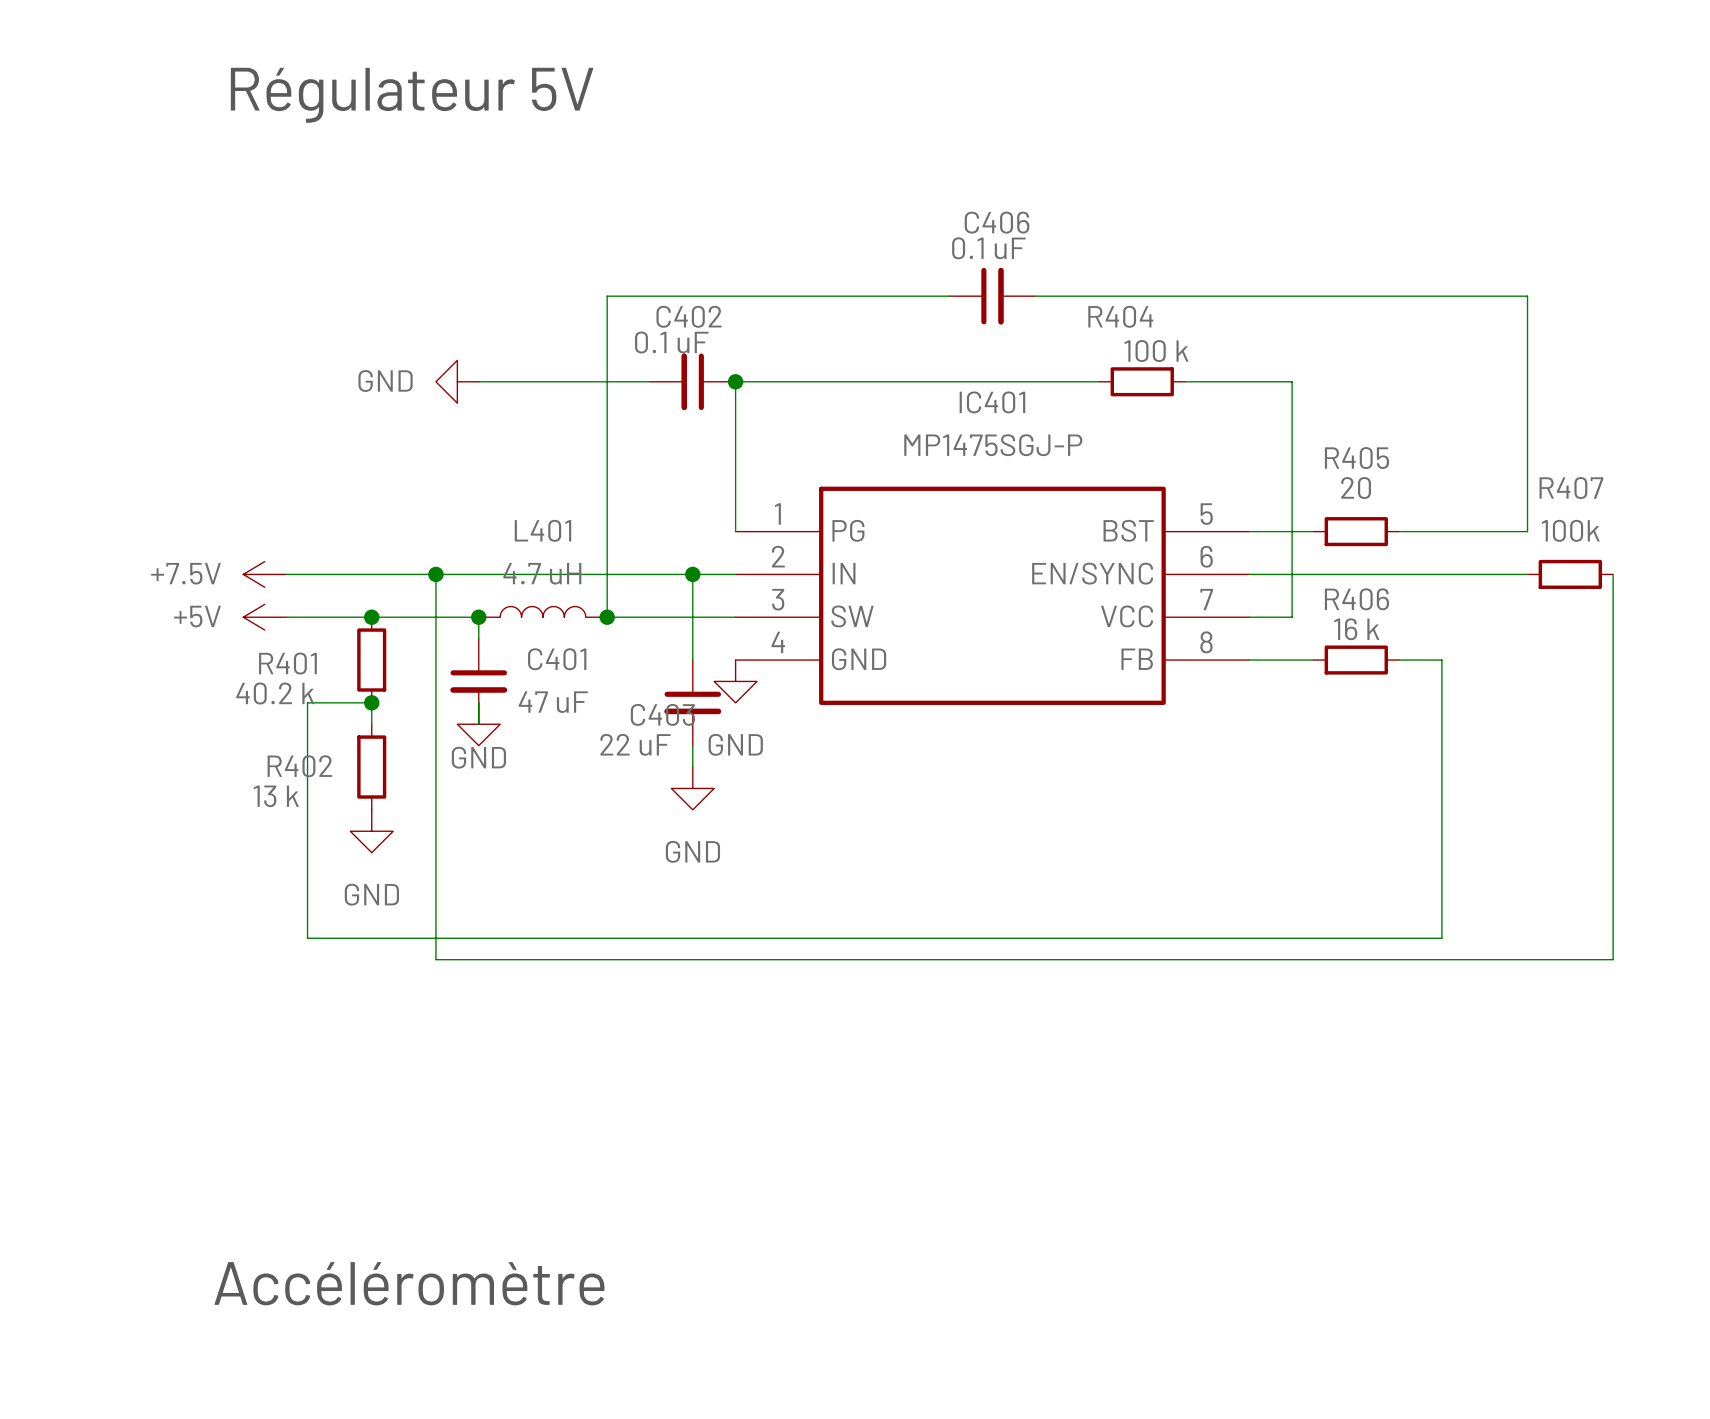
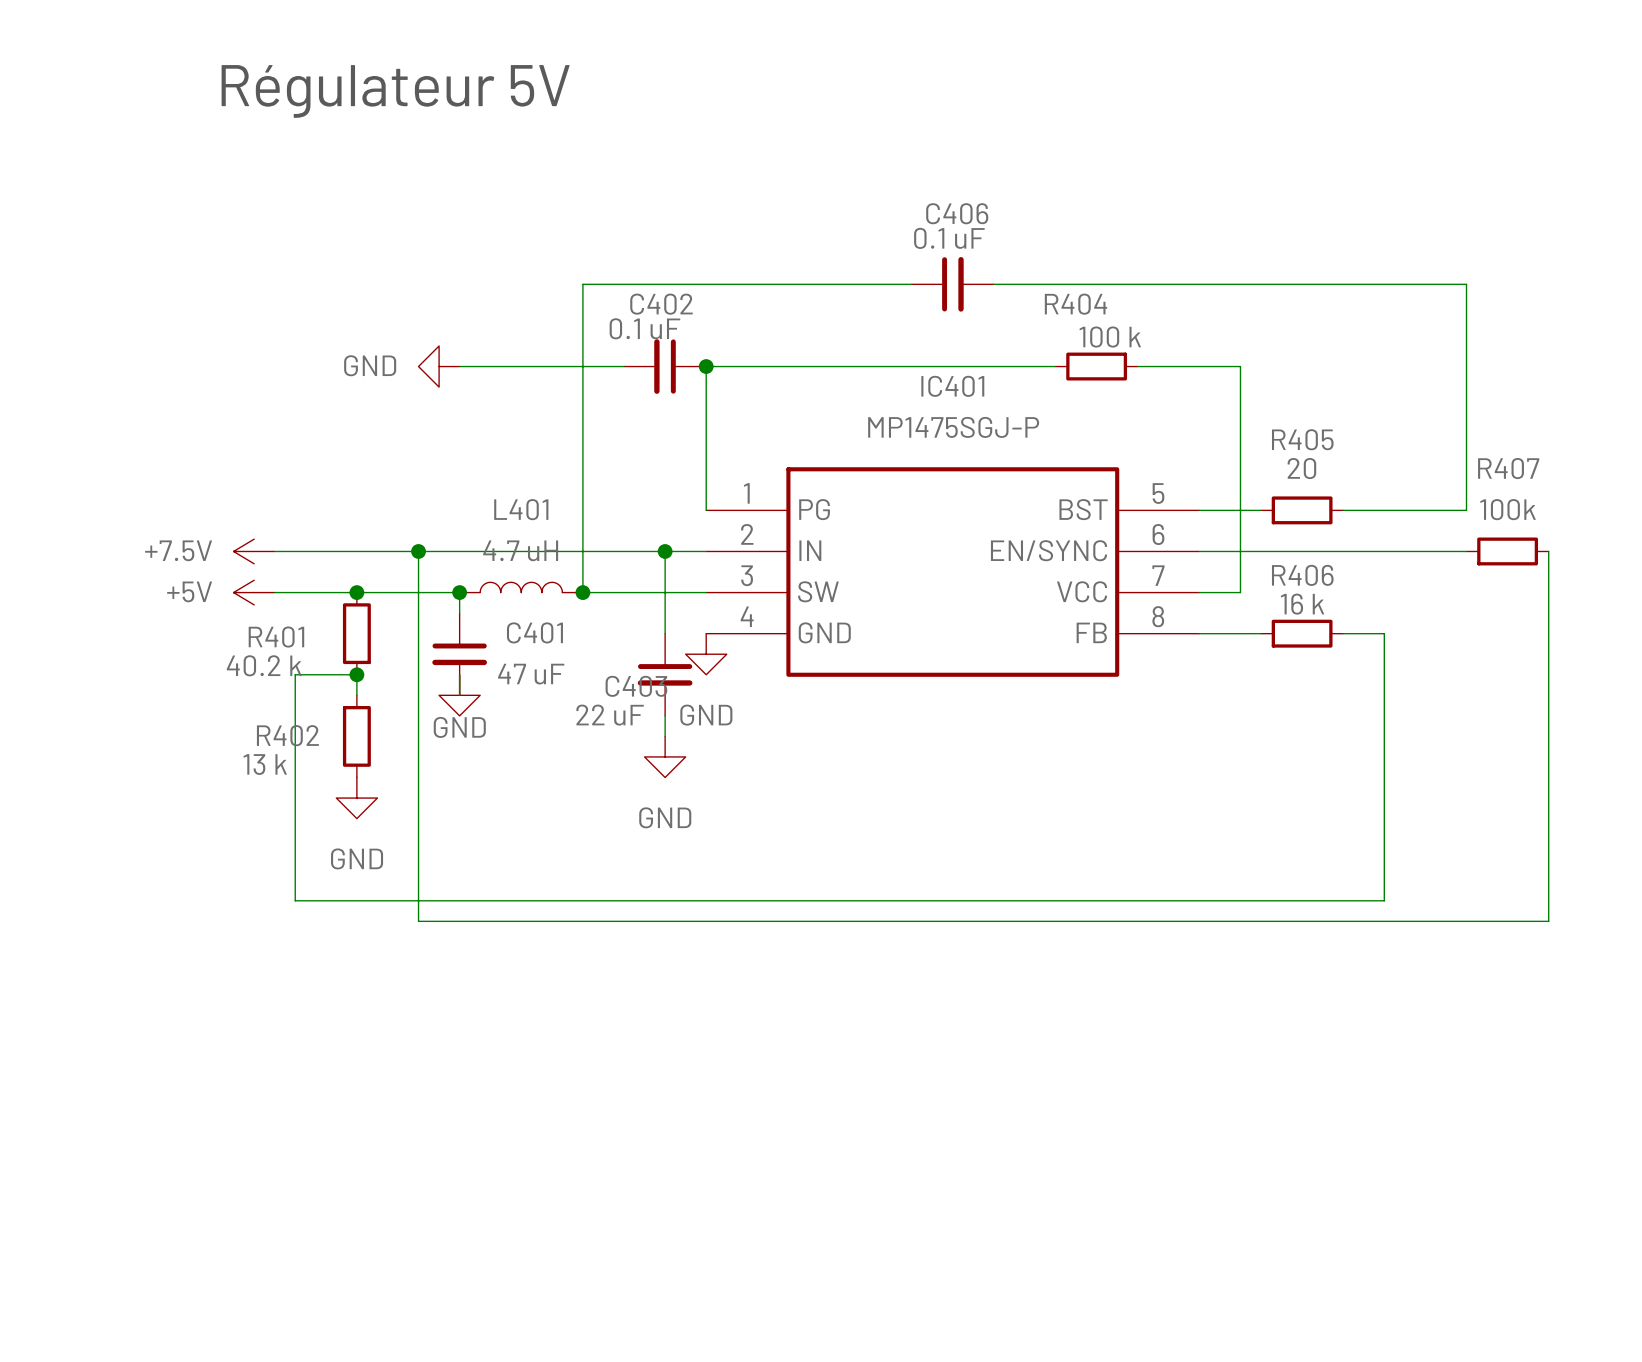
text: Accéléromètre (409, 1283) -> none

